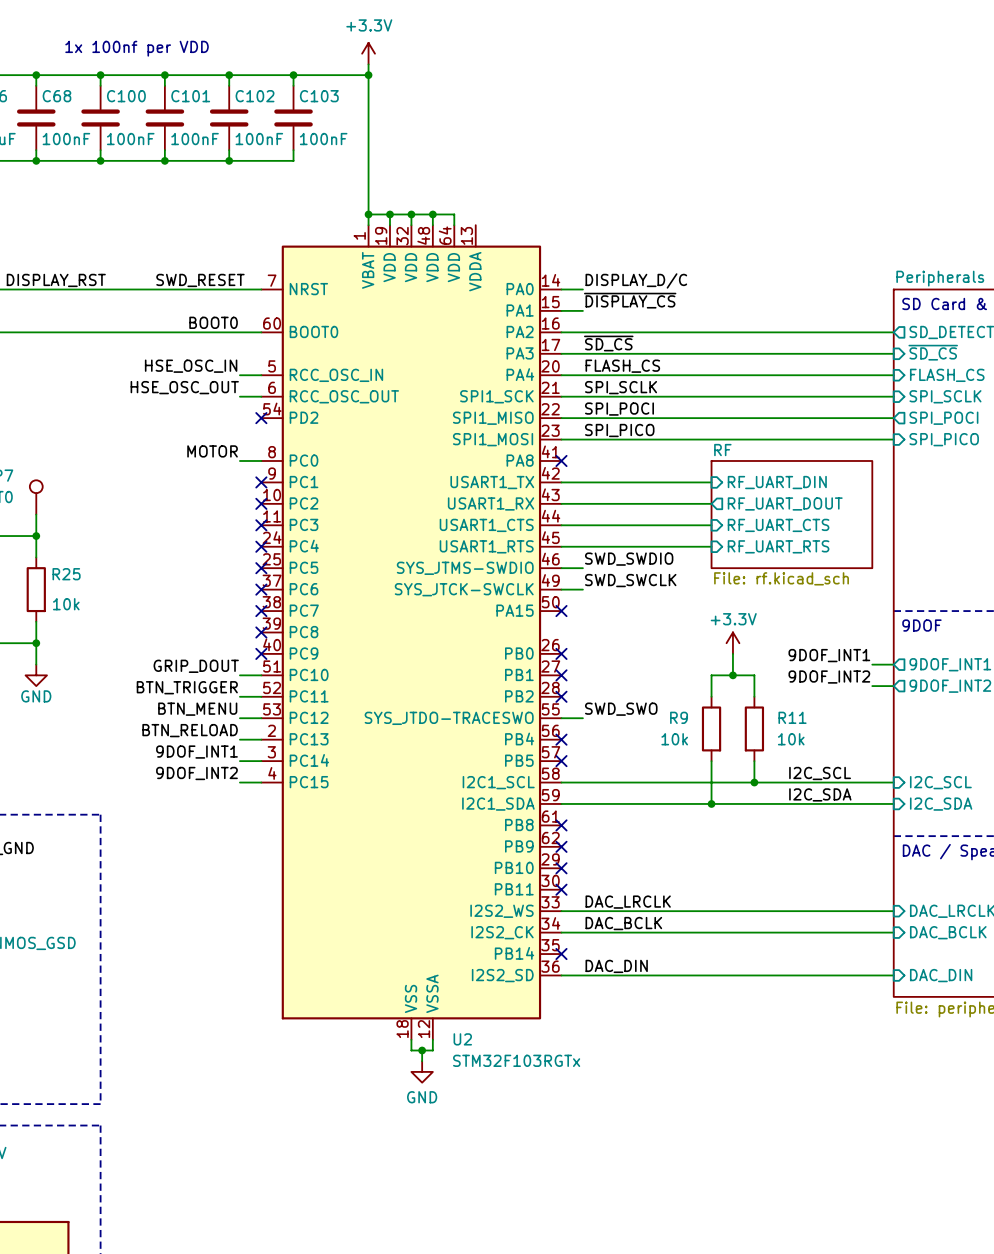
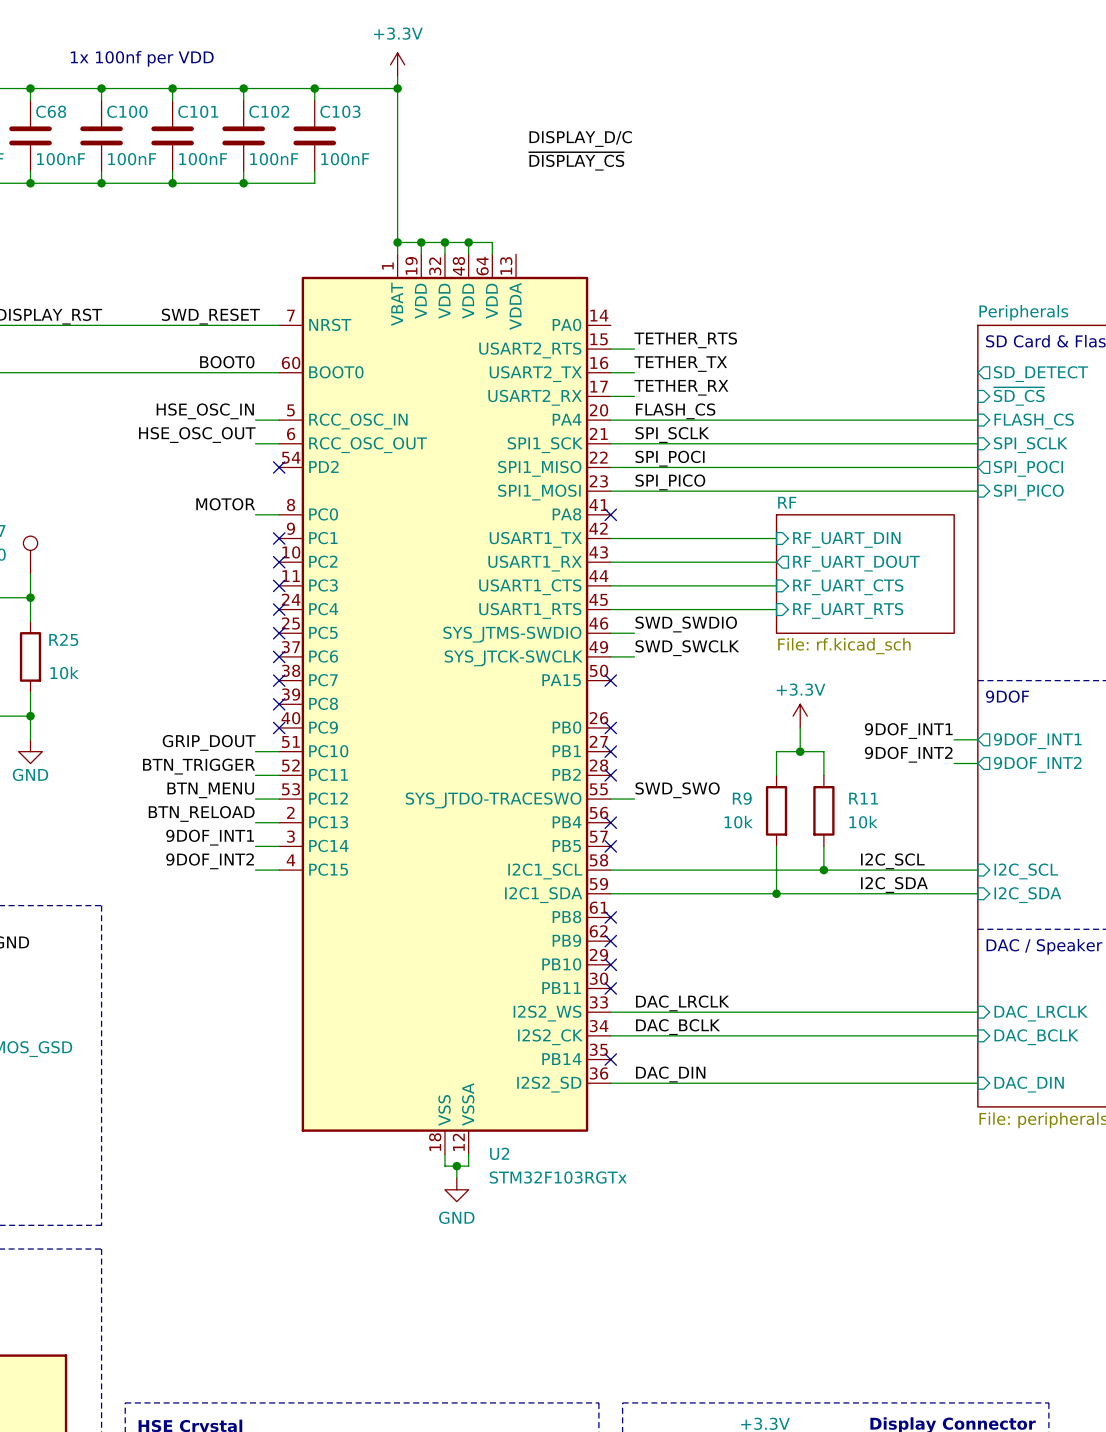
label: none -> ~{DISPLAY_CS} (576, 161)
label position: DISPLAY_D/C (636, 280) -> DISPLAY_D/C (580, 138)
wire: (561, 289) (582, 289) -> none
label: ~{DISPLAY_CS} (630, 300) -> TETHER_RTS (685, 340)
U2 pin name: PA1 (520, 310) -> USART2_RTS (530, 350)
label: none -> TETHER_TX (680, 364)
U2 pin name: PA2 (520, 331) -> USART2_TX (535, 374)
wire: (582, 332) (893, 332) -> none
label: ~{SD_CS} (608, 343) -> TETHER_RX (681, 387)
U2 pin name: PA3 (520, 353) -> USART2_RX (535, 397)
wire: (582, 353) (893, 353) -> none

